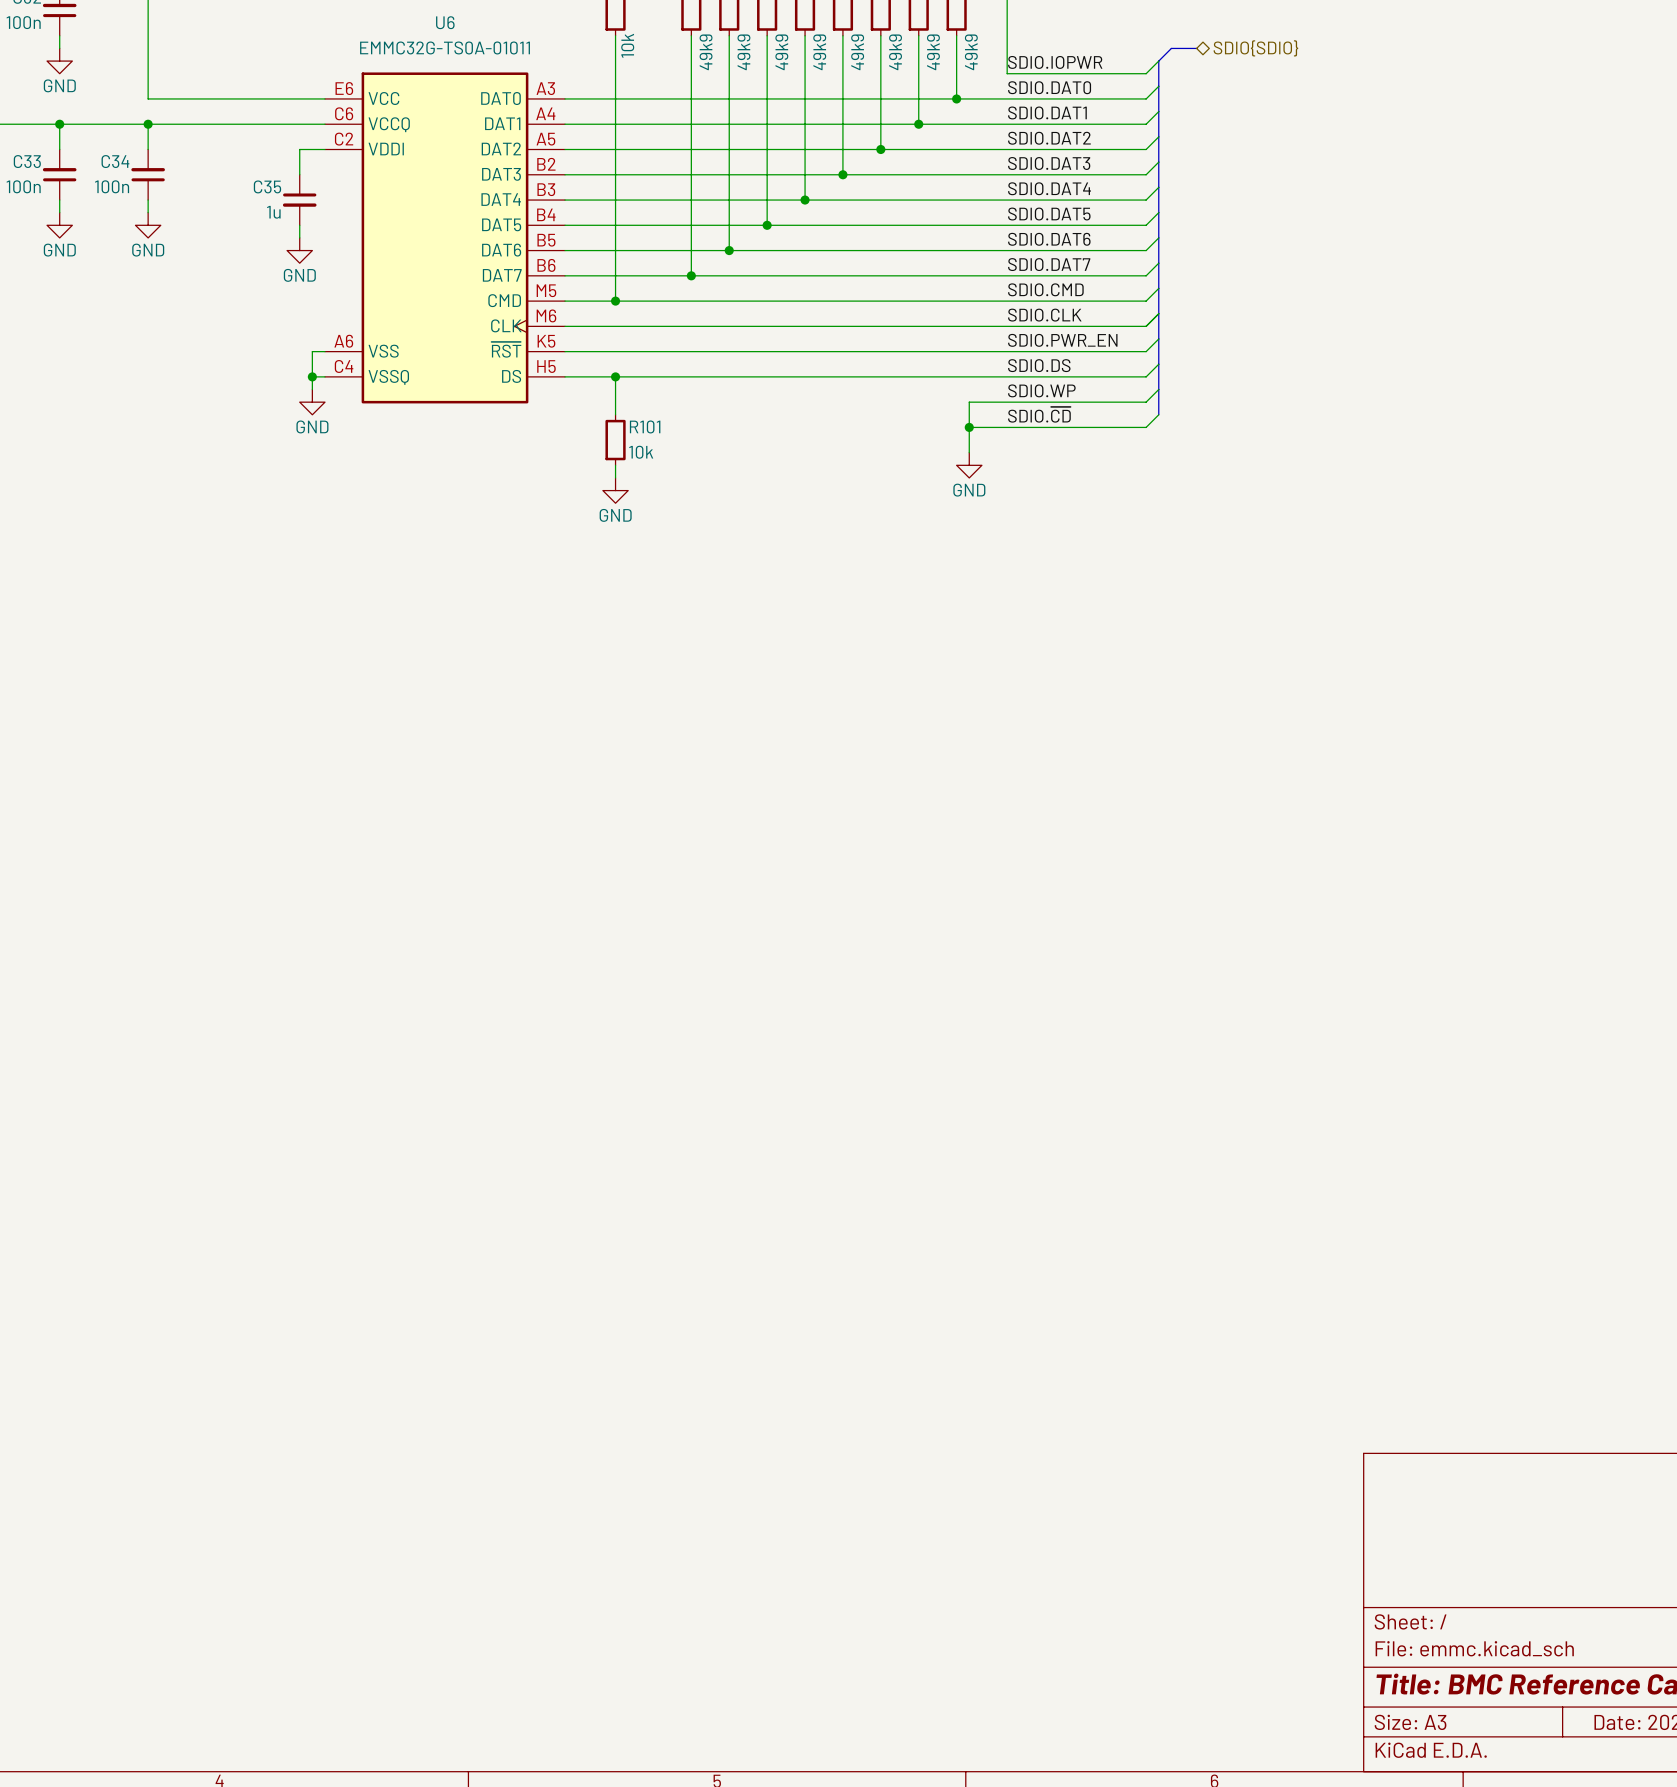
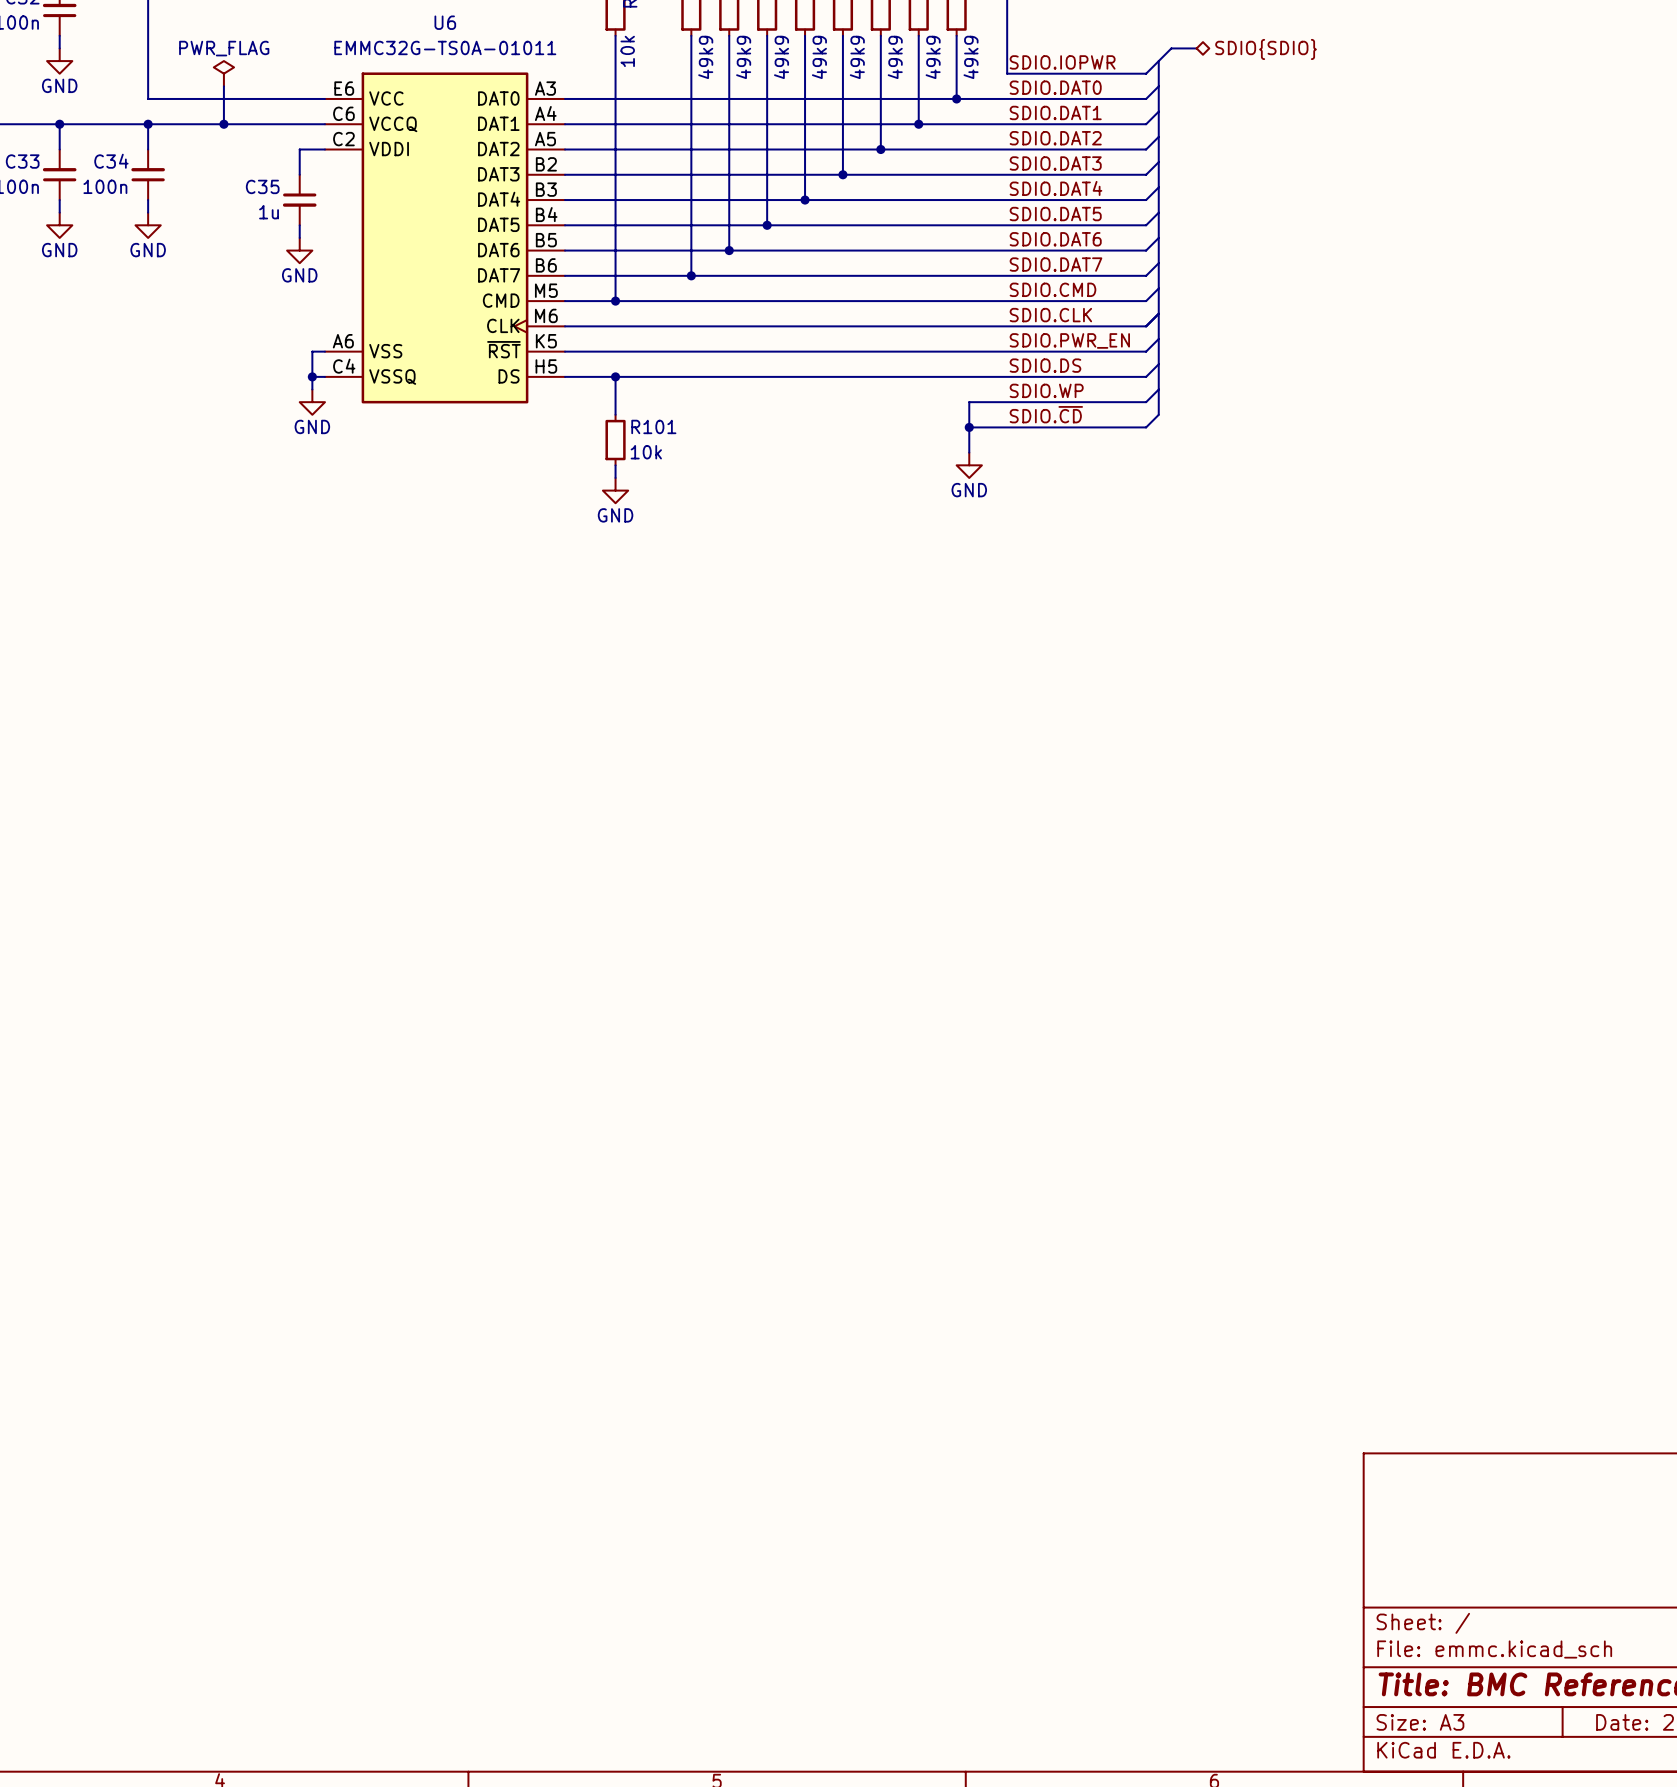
power symbol: none -> PWR_FLAG (223, 73)
wire: none -> (223, 86) (223, 124)
junction: none -> (223, 124)

